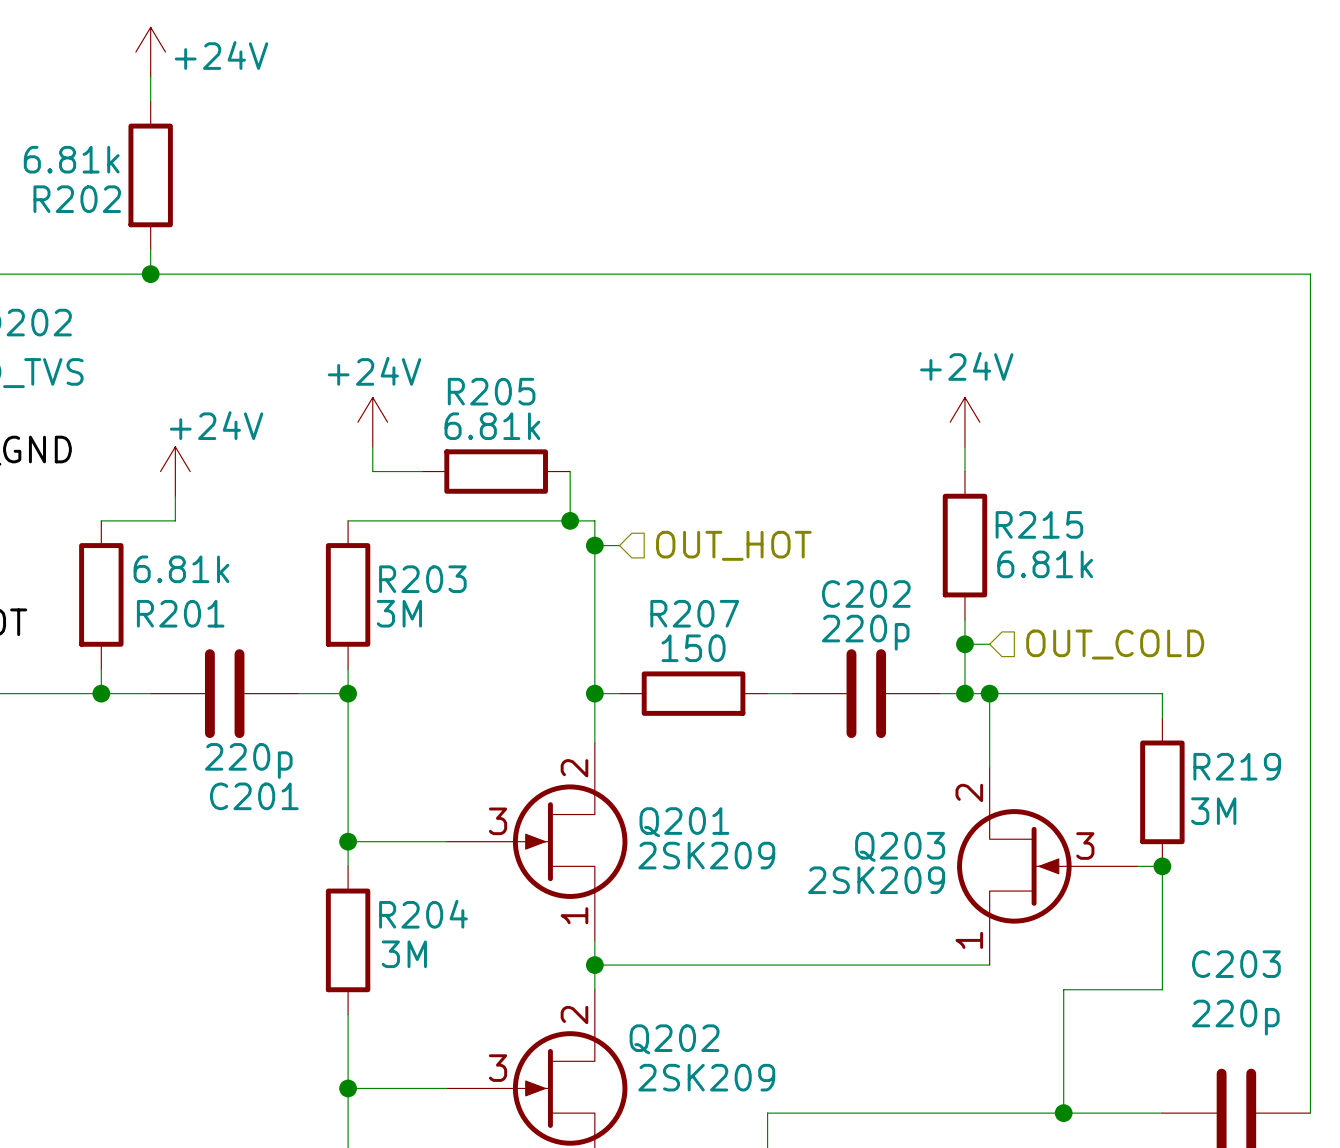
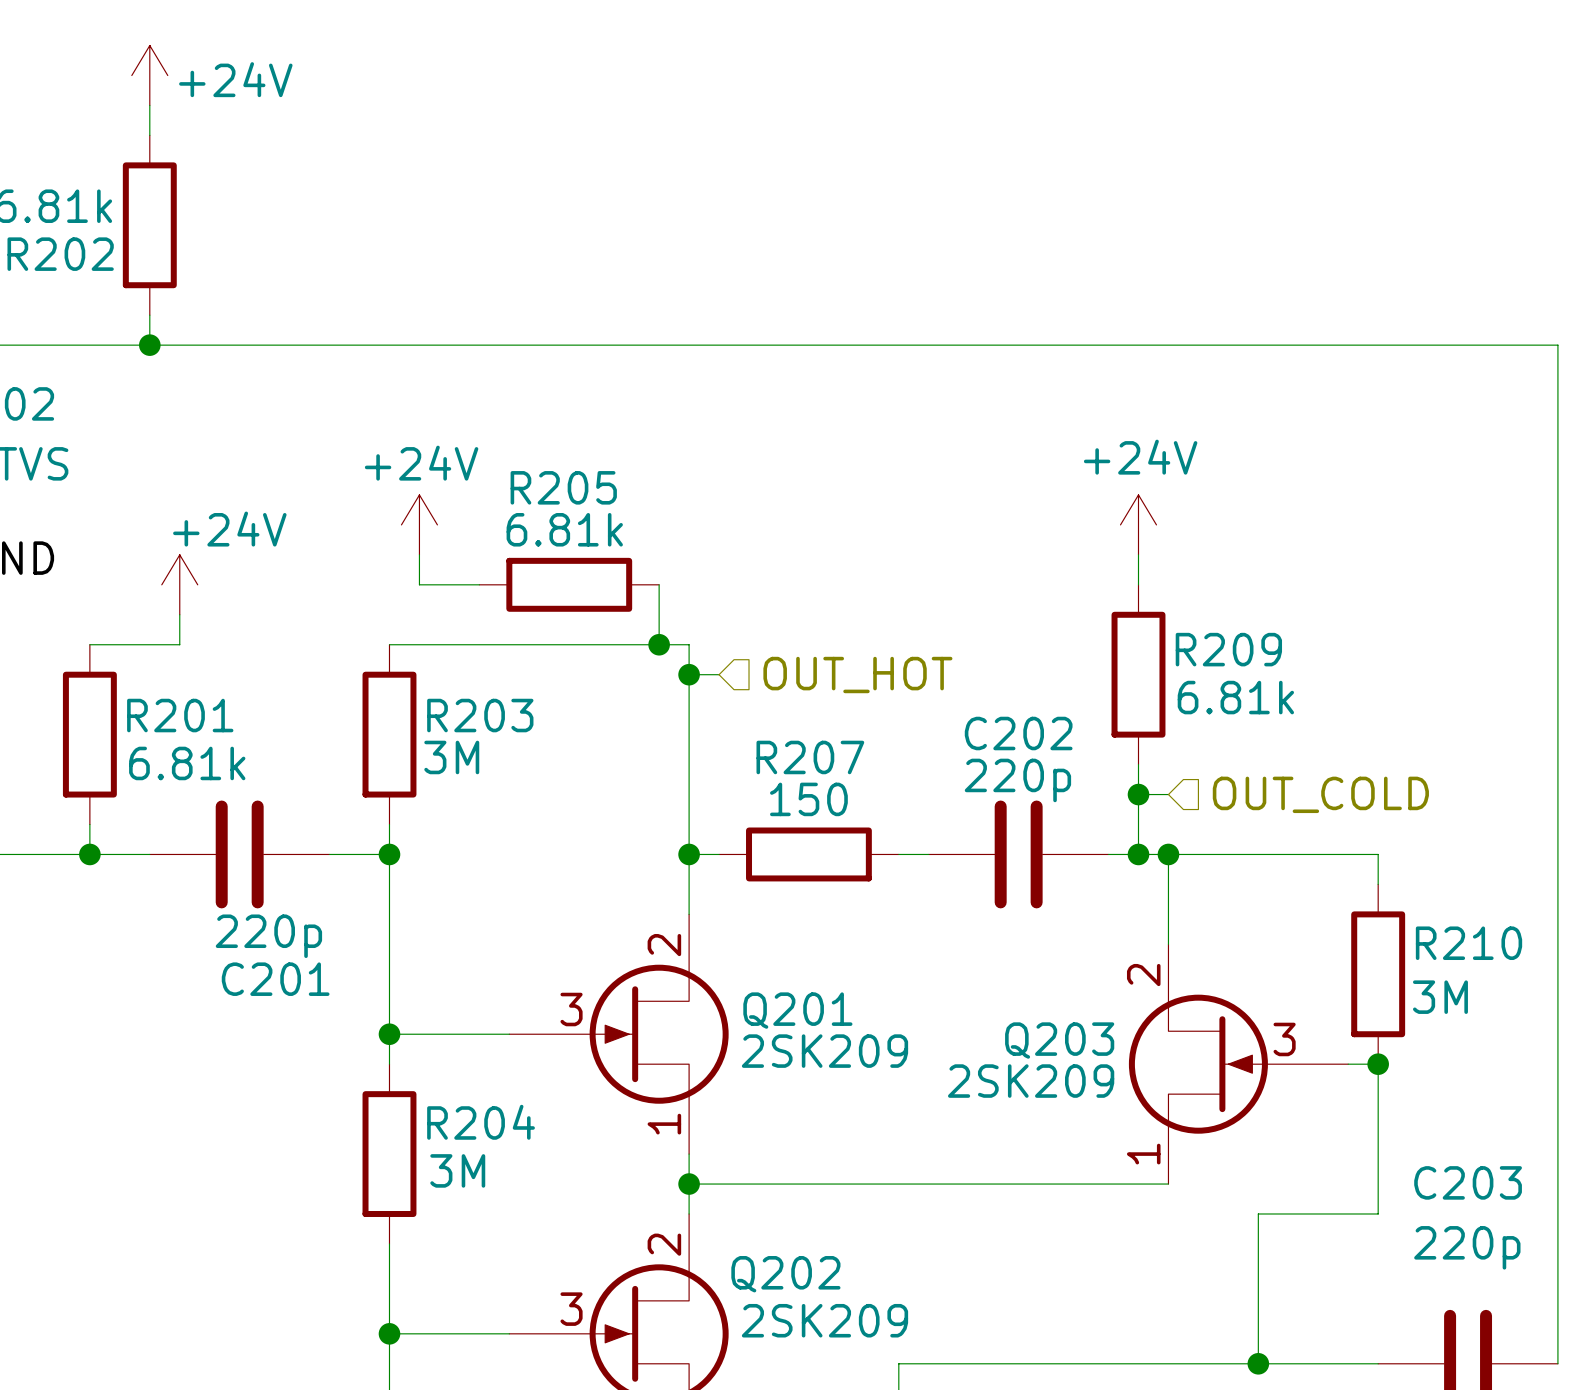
R215 name: R215 (1039, 524) -> R209 (1228, 649)
R201 value position: 6.81k (181, 569) -> 6.81k (187, 763)
R201 name position: R201 (180, 613) -> R201 (180, 715)
R219 name: R219 (1237, 766) -> R210 (1469, 943)

